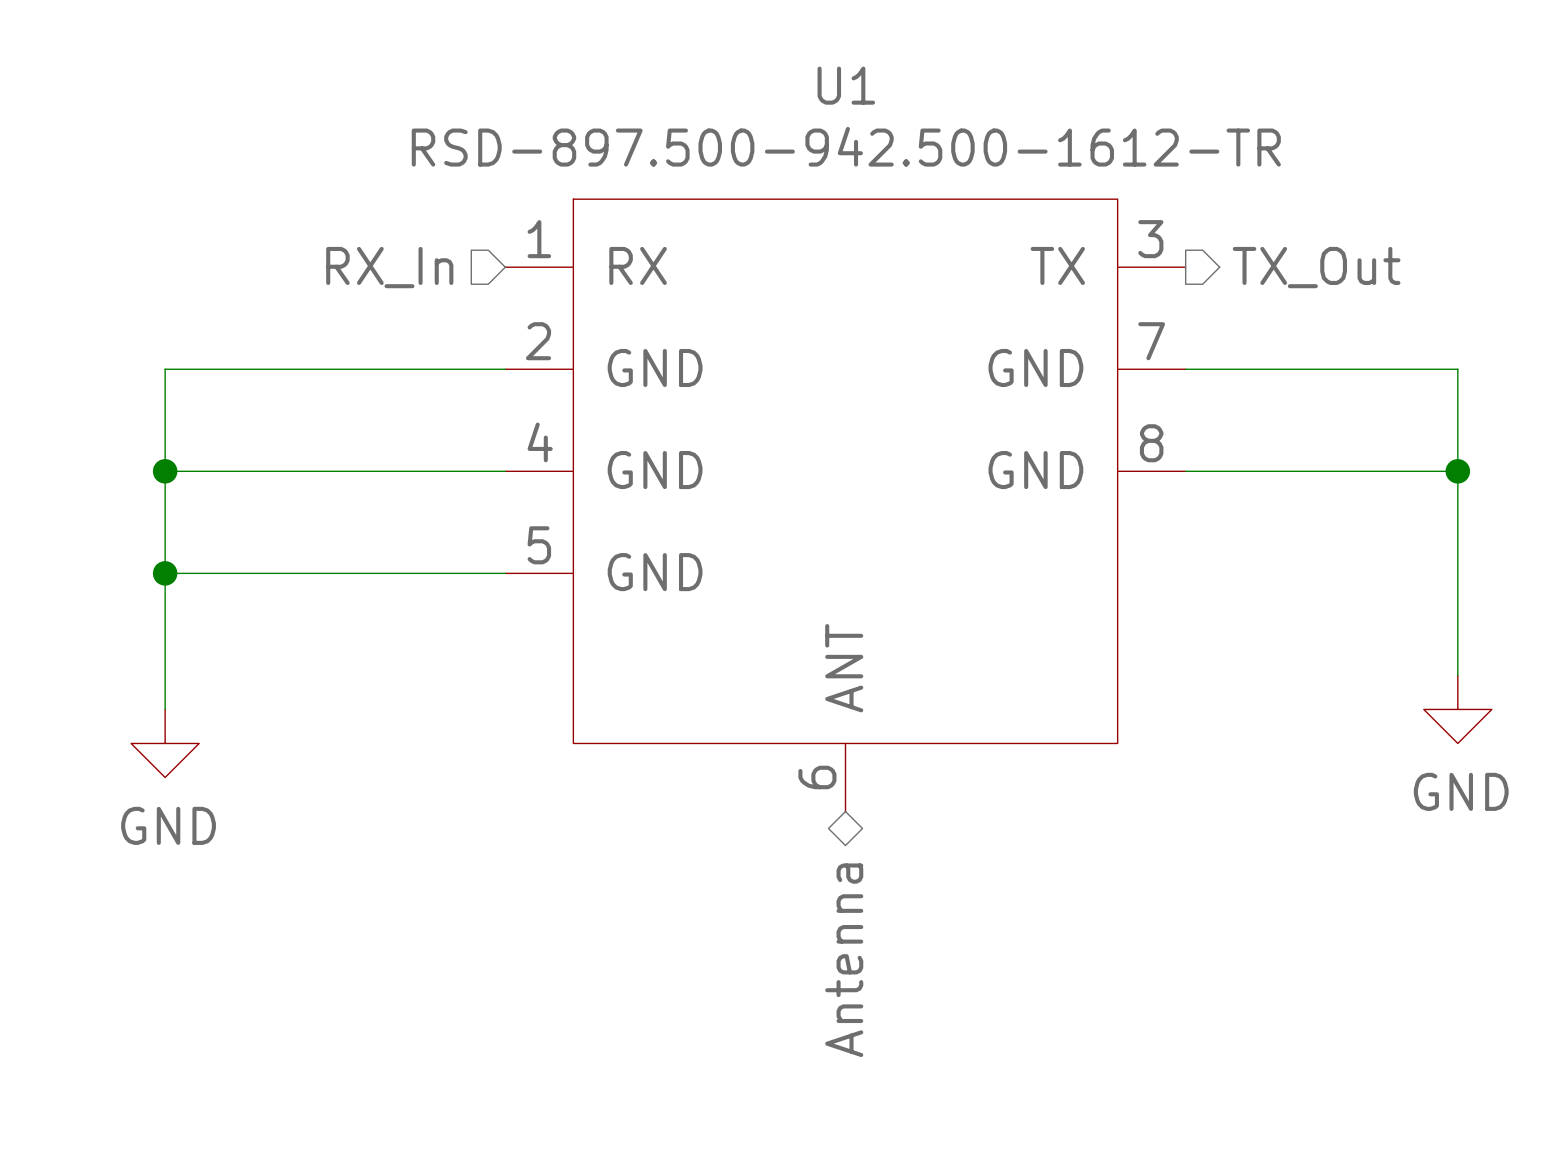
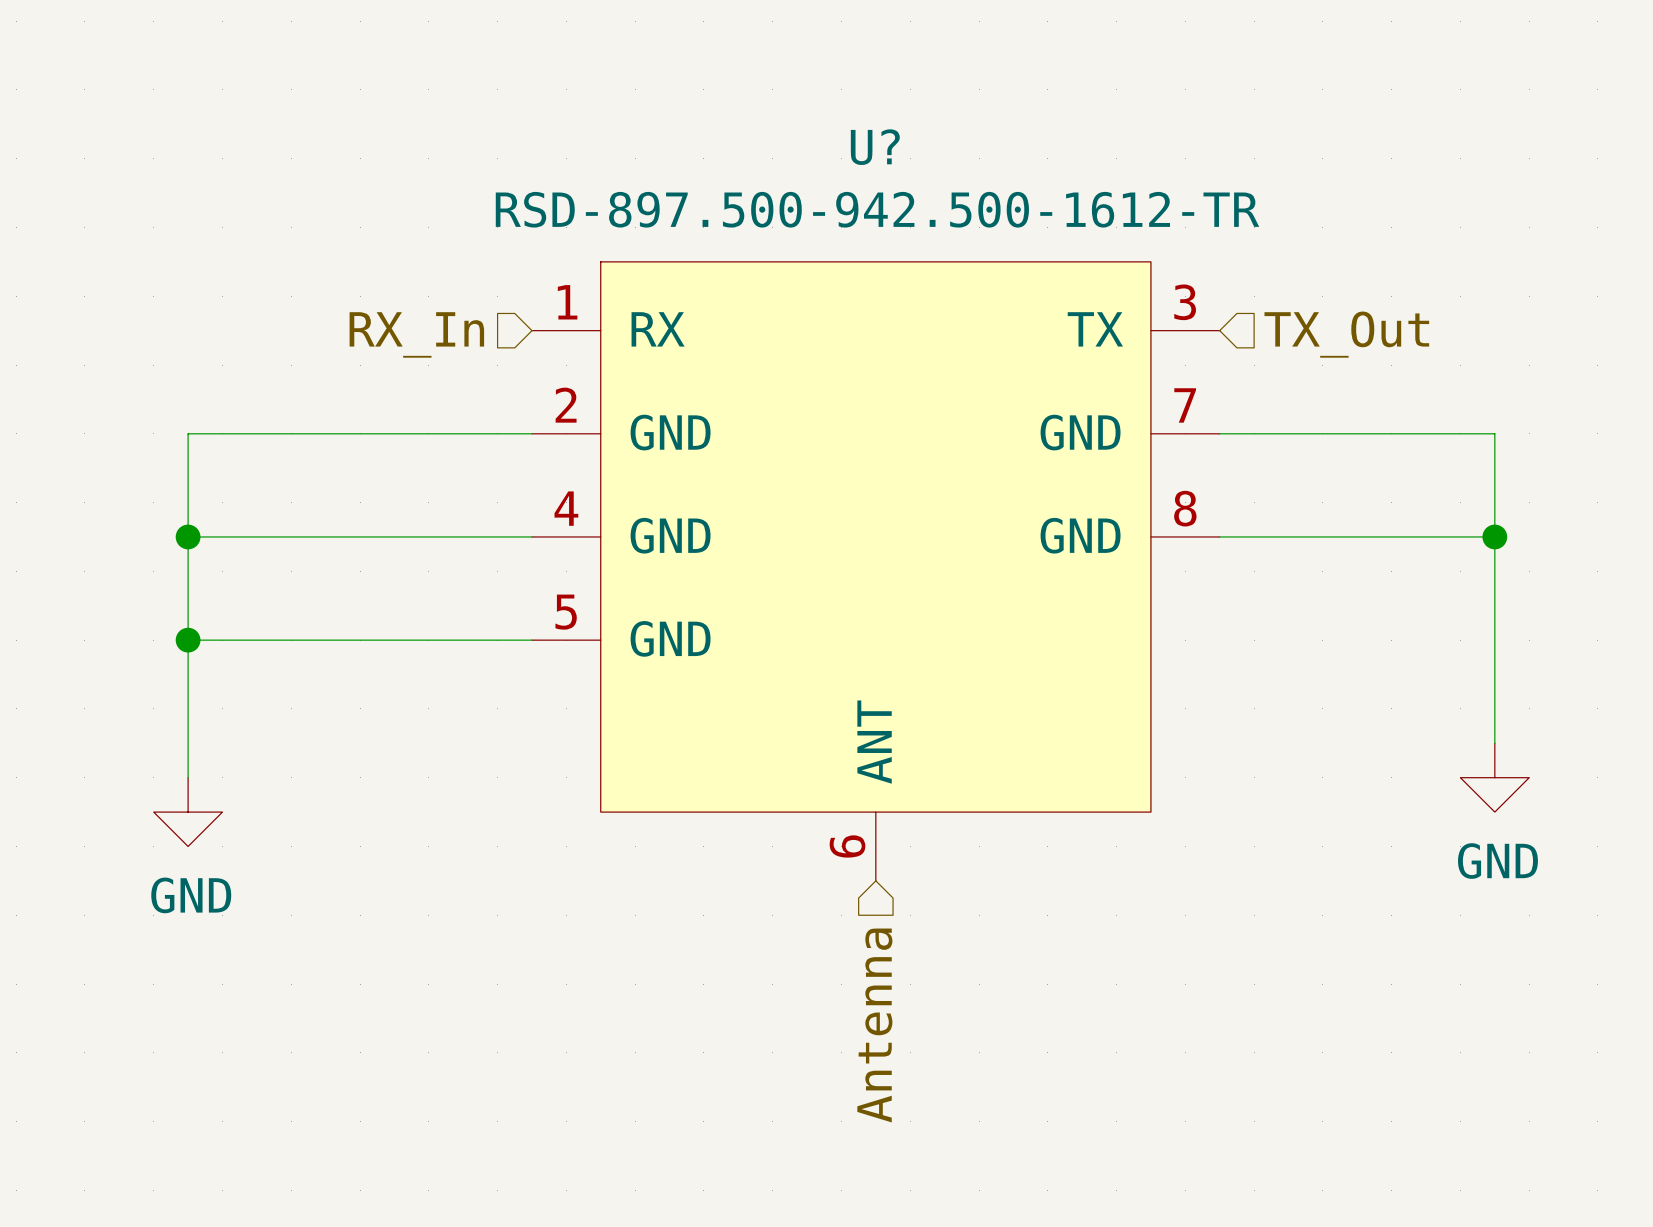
U1 name: U1 (846, 85) -> U? (875, 147)
hierarchical label shape: output (1316, 267) -> input (1346, 334)
hierarchical label shape: bidirectional (844, 960) -> input (874, 1025)

